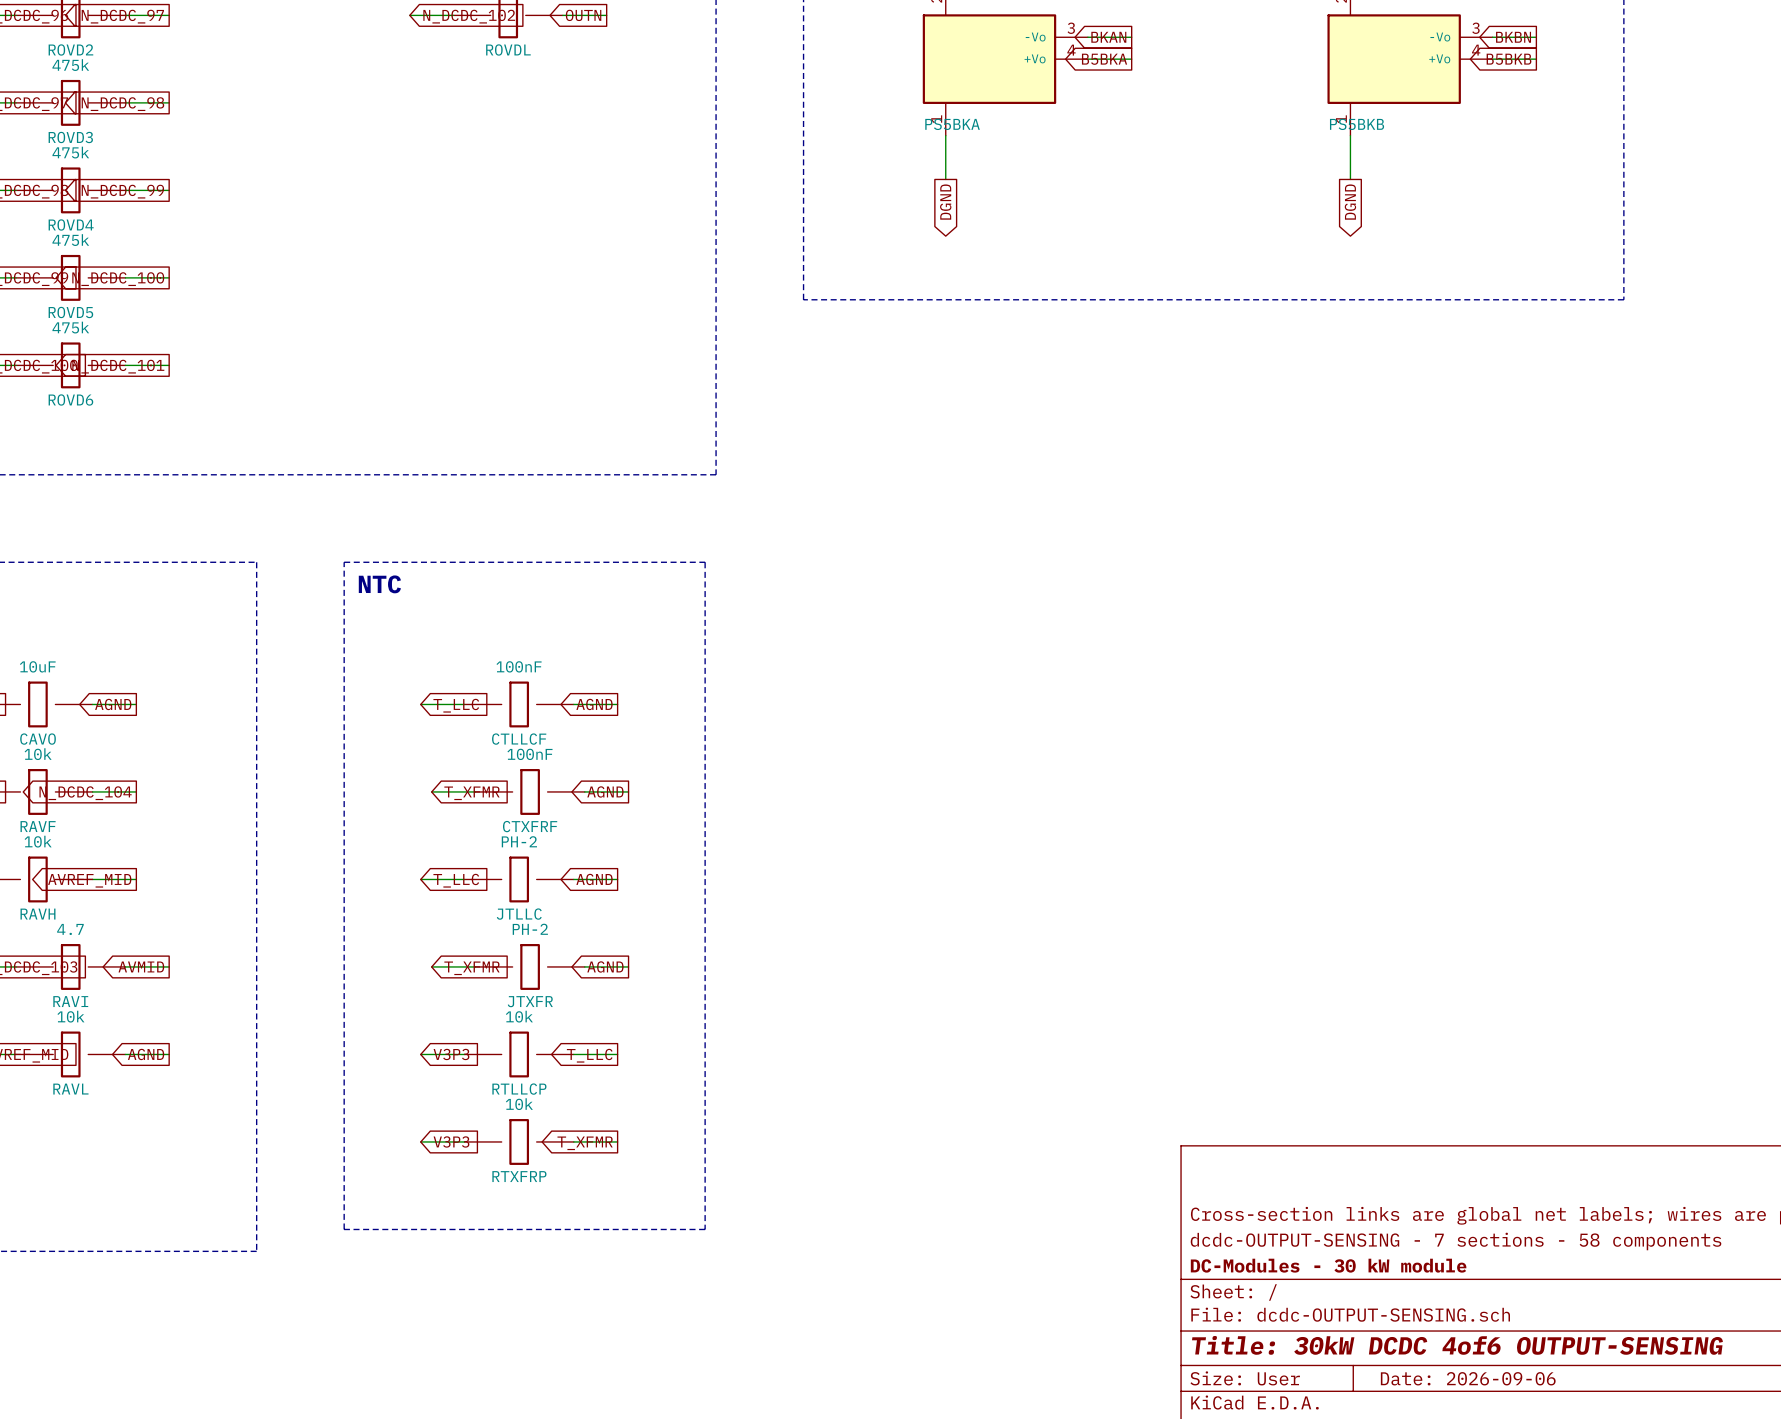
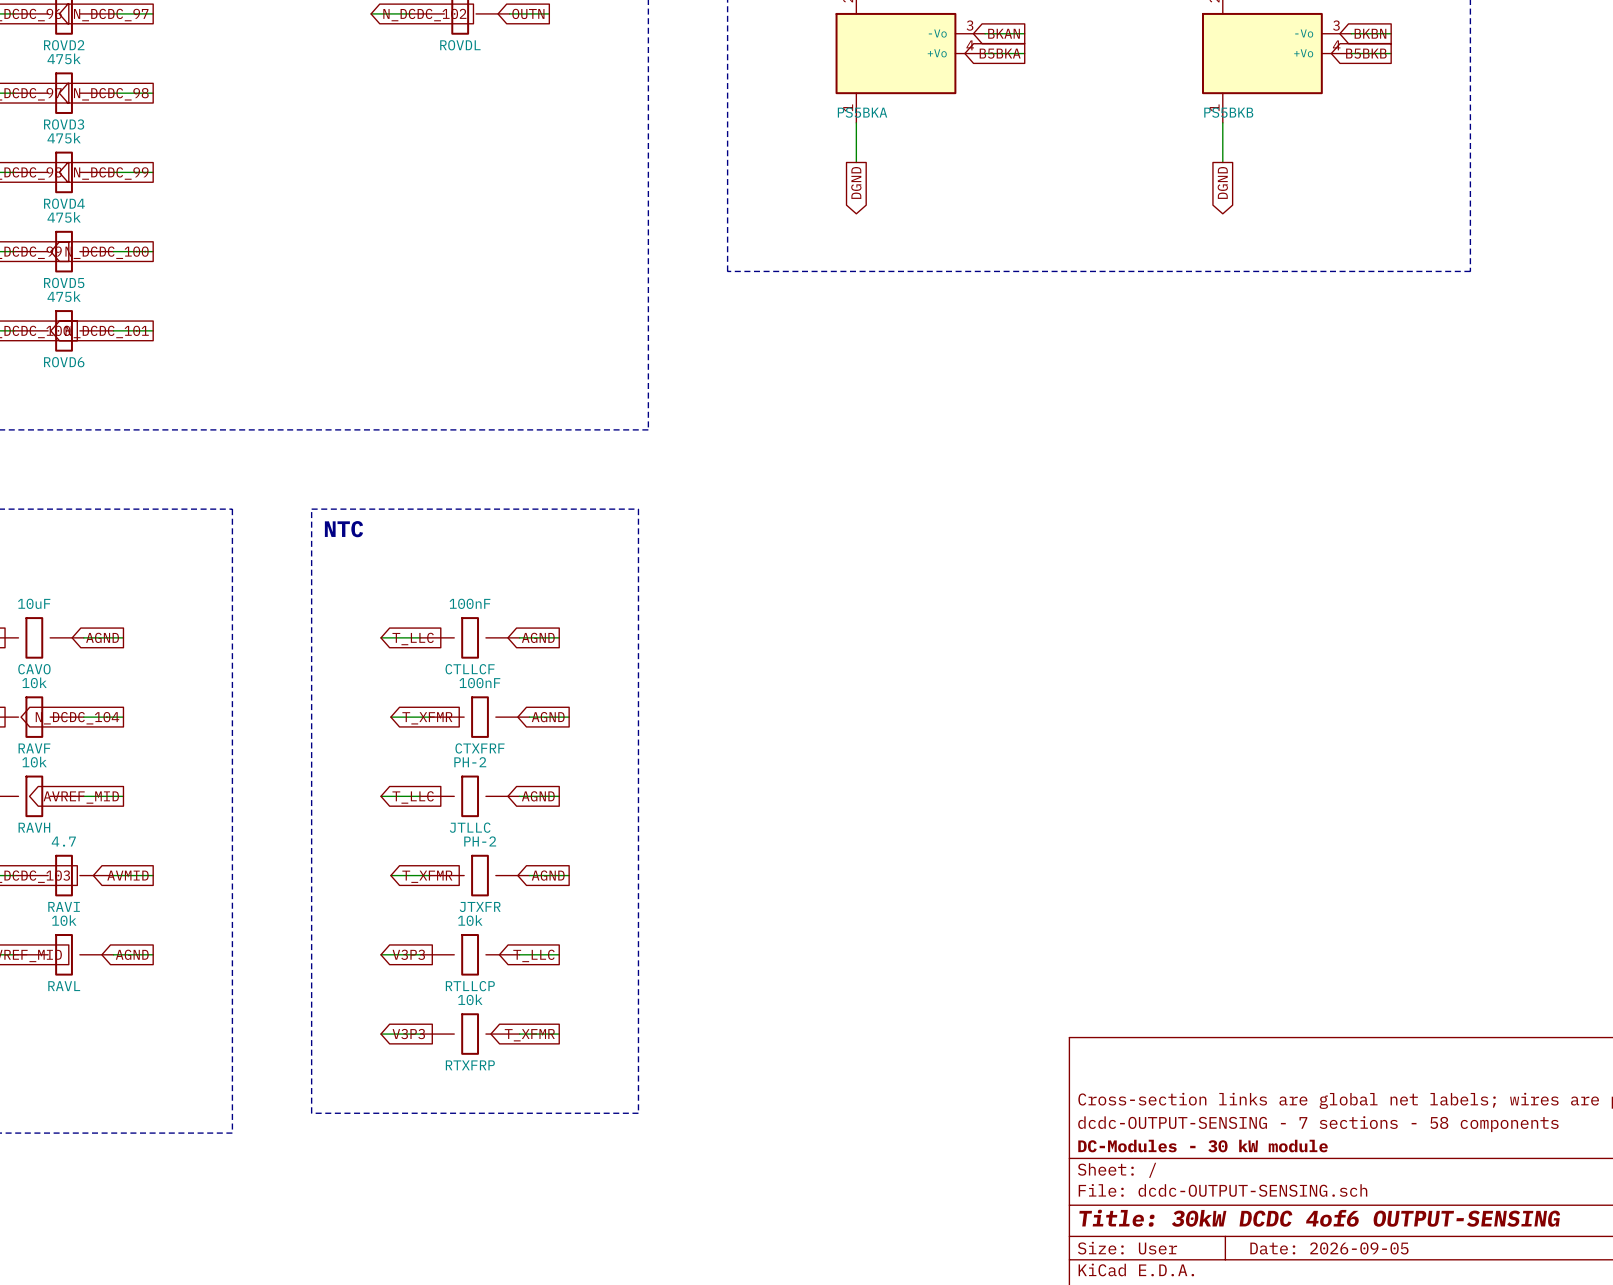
title block: Date: 2026-09-06 (1468, 1378) -> Date: 2026-09-05 (1329, 1248)

